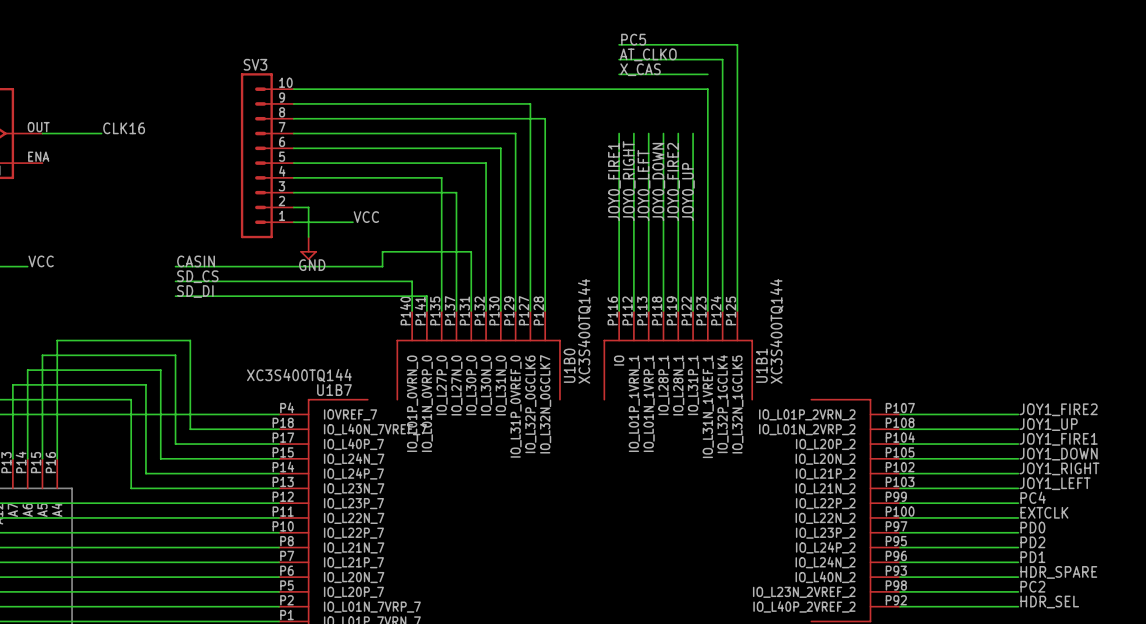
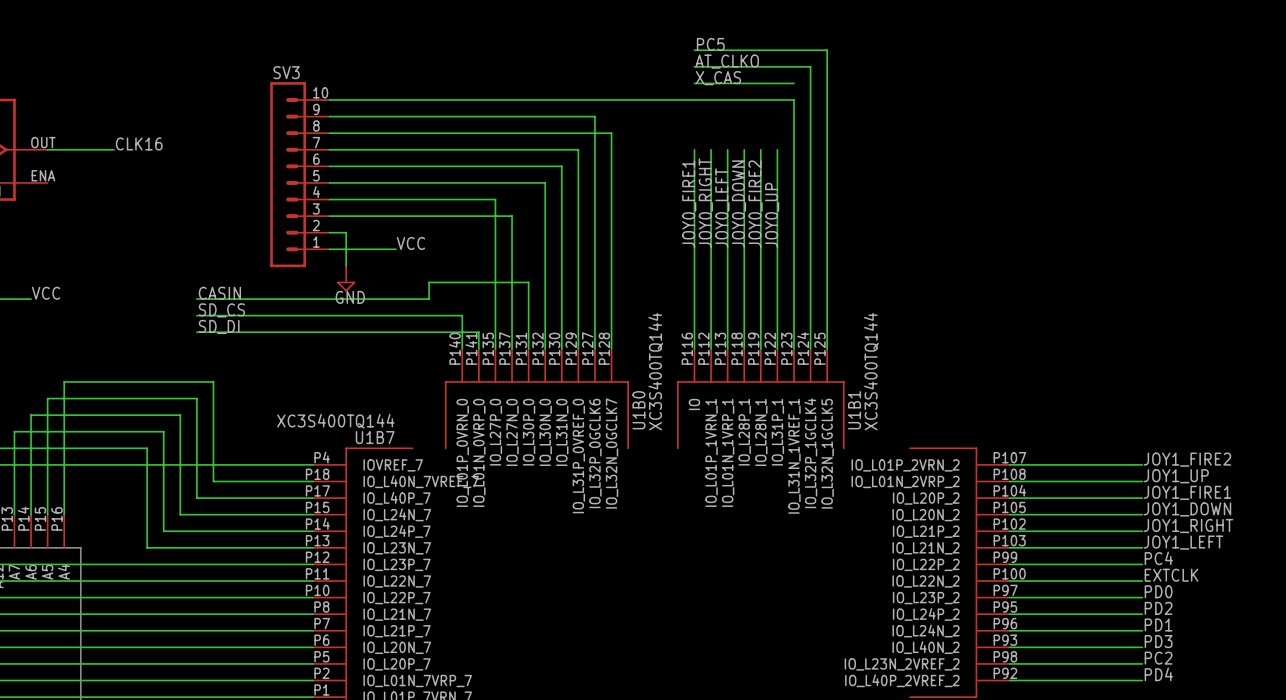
label: HDR_SPARE (1058, 572) -> PD3 (1158, 641)
label: HDR_SEL (1049, 602) -> PD4 (1158, 674)

